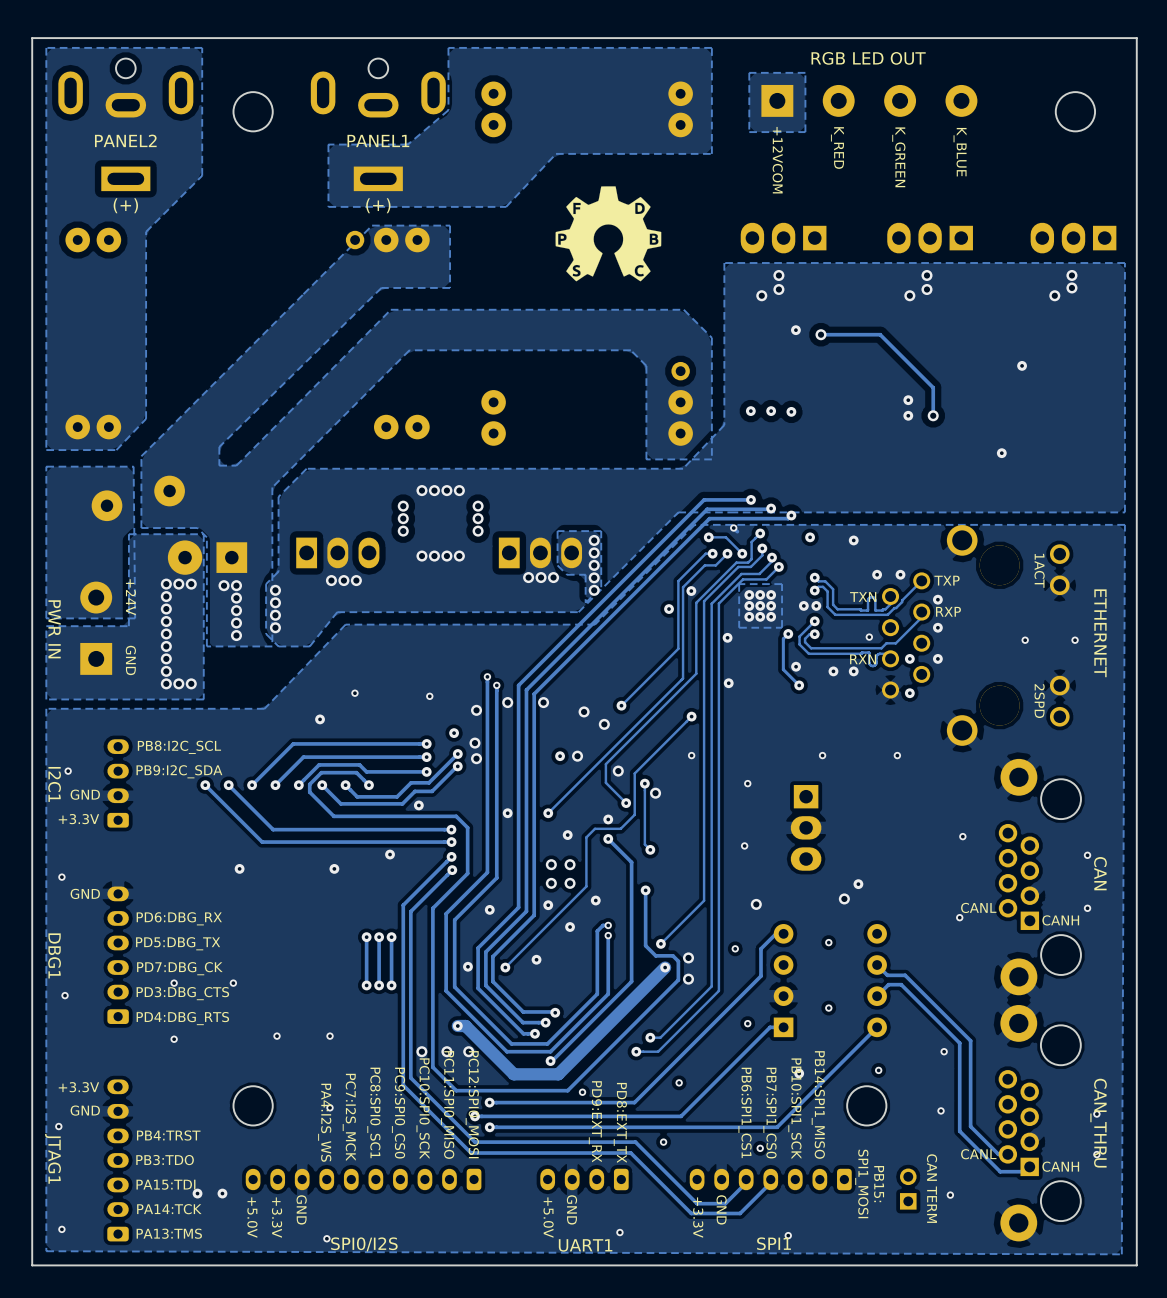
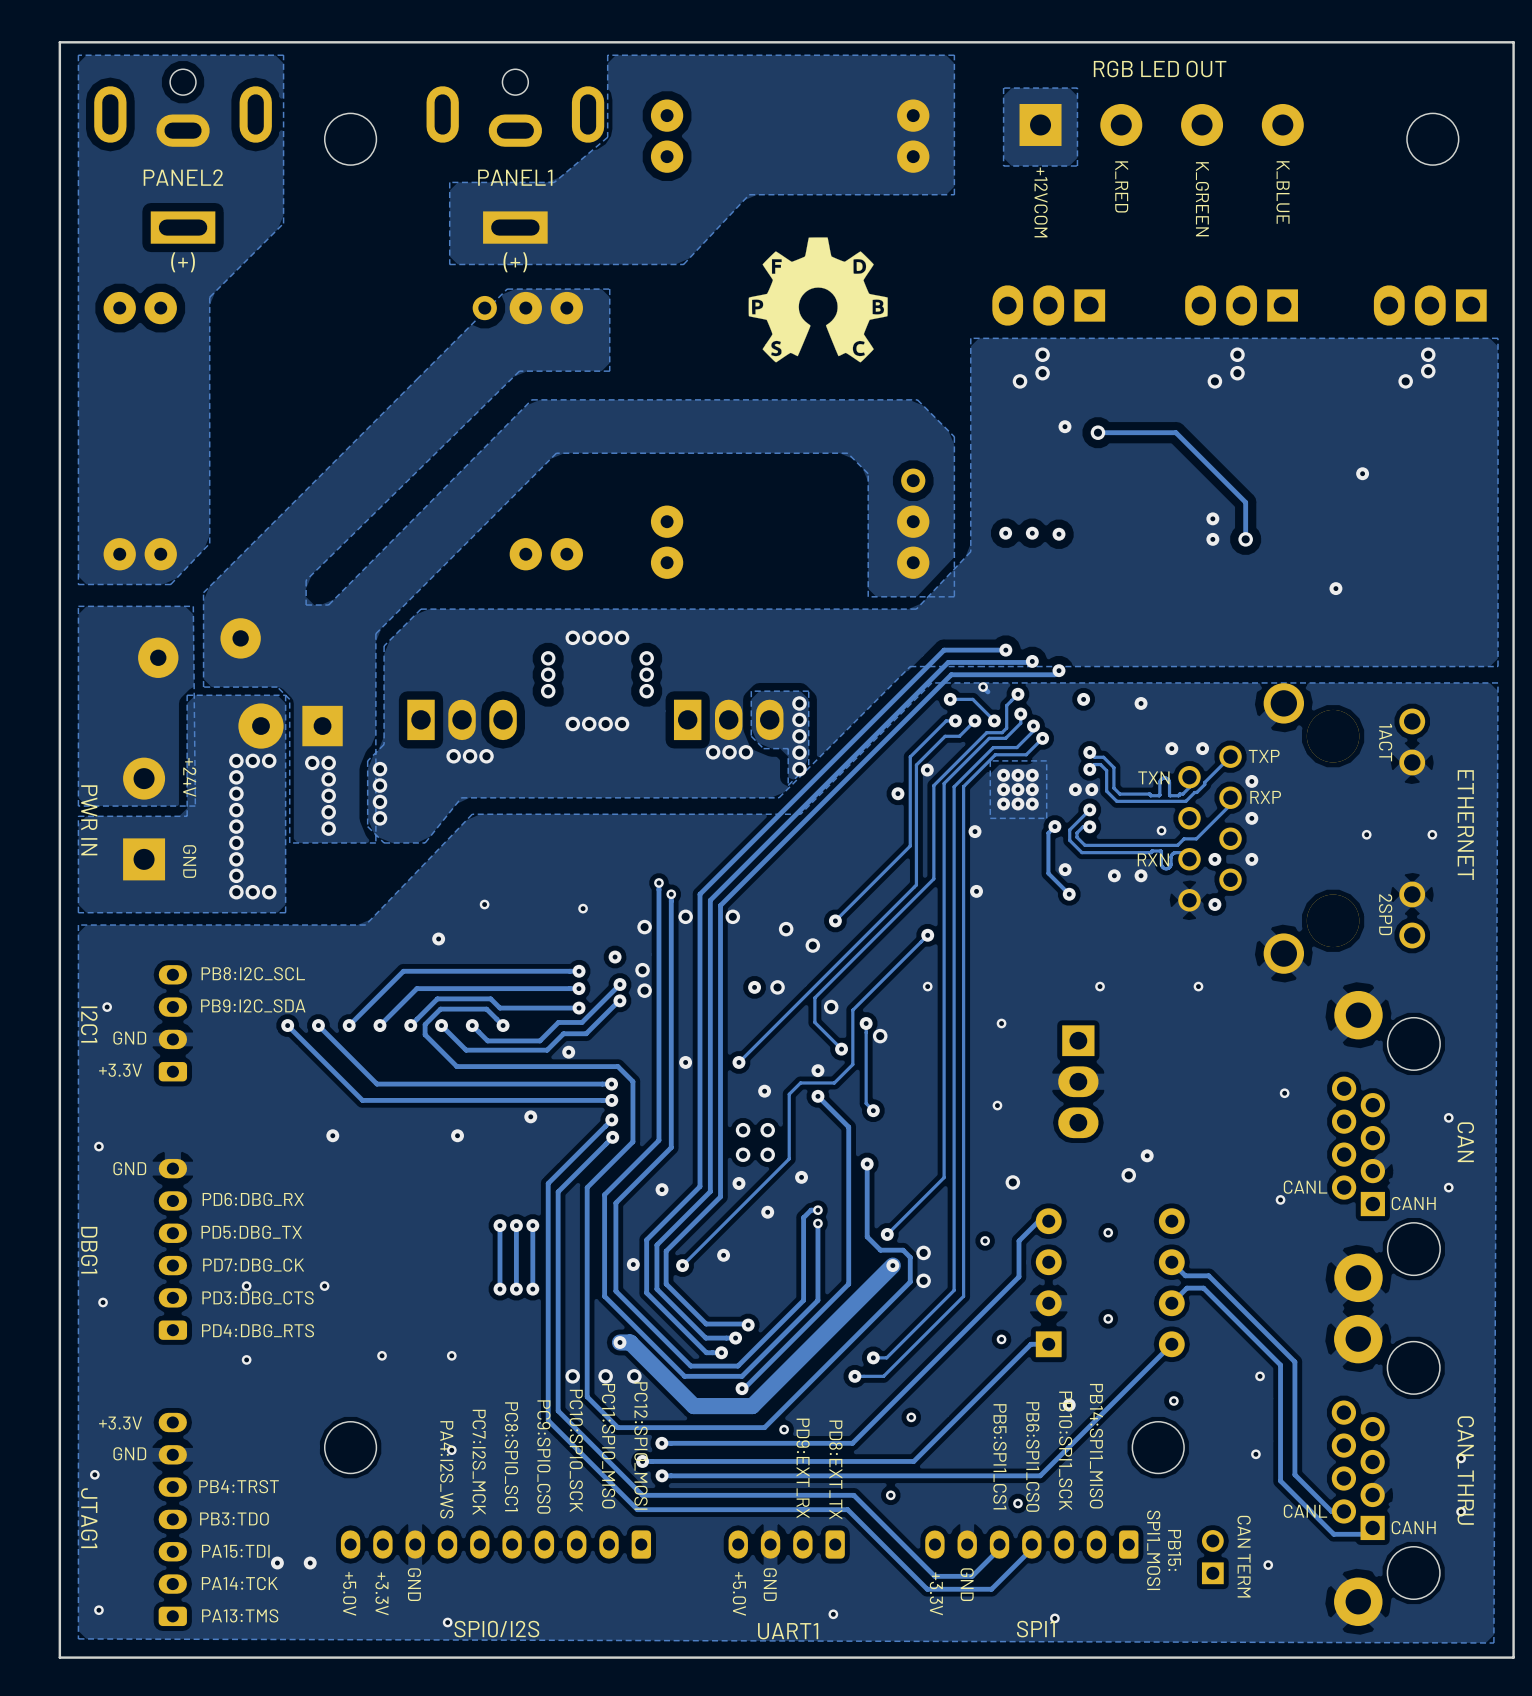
text: PB6:SPI1_CS1 (745, 1112) -> PB5:SPI1_CS1 (999, 1456)
text: PB7:SPI1_CS0 (769, 1113) -> PB6:SPI1_CS0 (1032, 1457)

